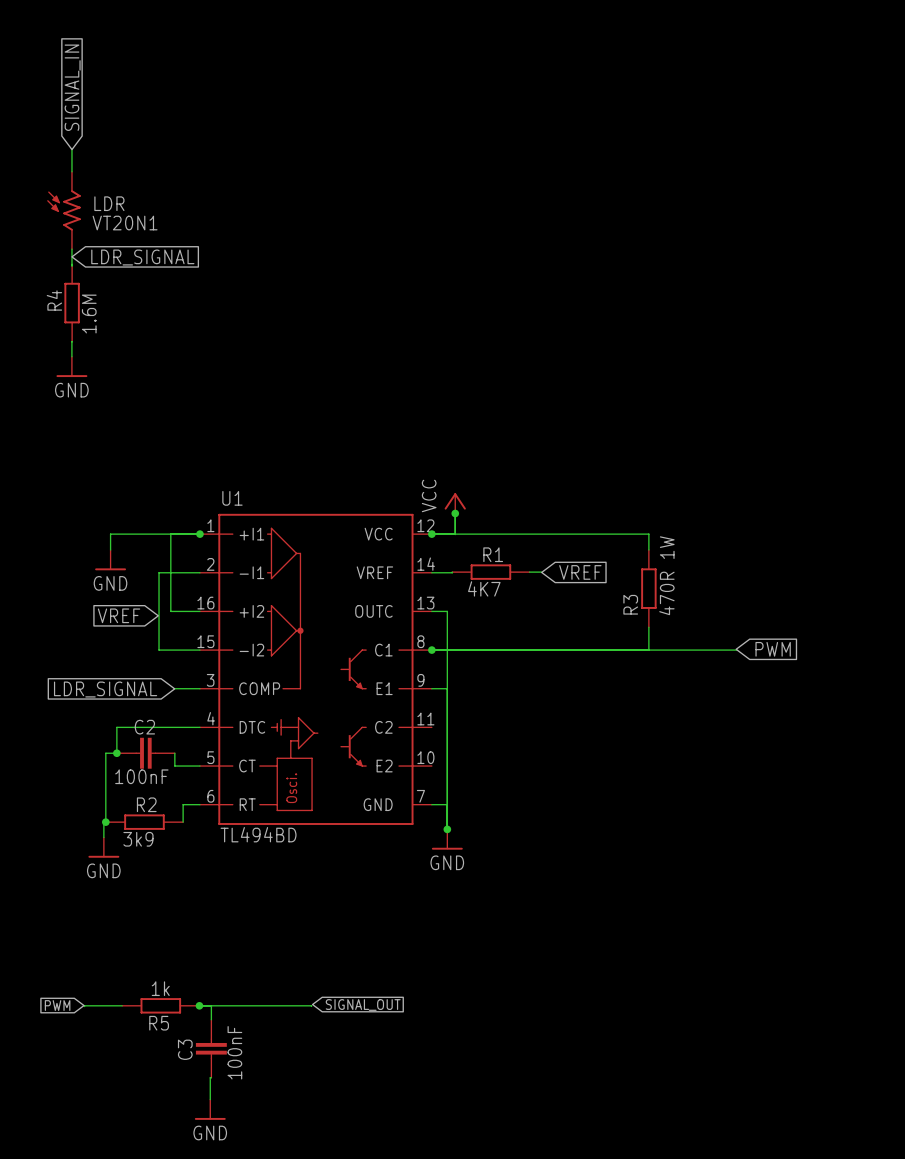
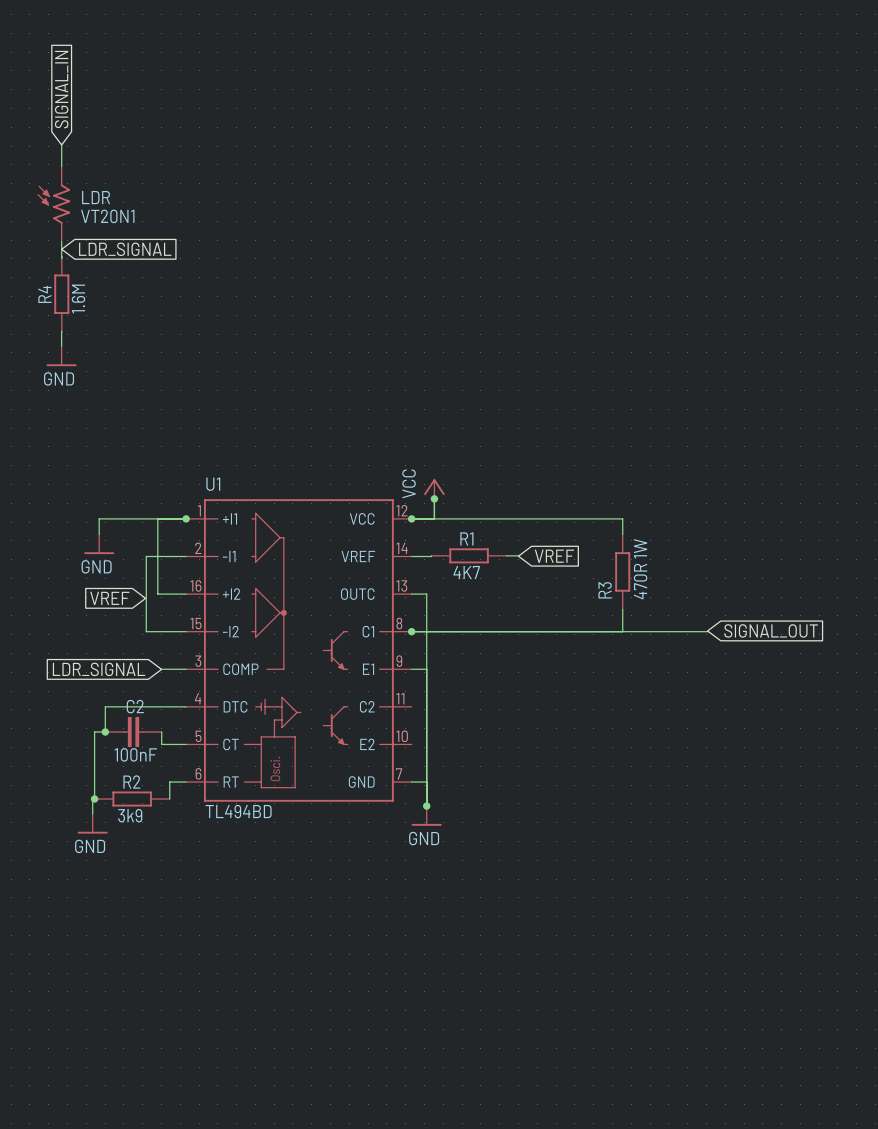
global label: PWM (773, 649) -> SIGNAL_OUT (771, 630)
global label: SIGNAL_OUT (363, 1004) -> none
global label: PWM (57, 1005) -> none
wire: (122, 1005) (84, 1006) -> none
R5: 1k (160, 1005) -> none
wire: (199, 1005) (311, 1006) -> none
junction: (199, 1005) -> none
wire: (211, 1005) (211, 1019) -> none
C3: 100nF (211, 1048) -> none
wire: (211, 1077) (210, 1099) -> none
power symbol: GND (210, 1109) -> none

